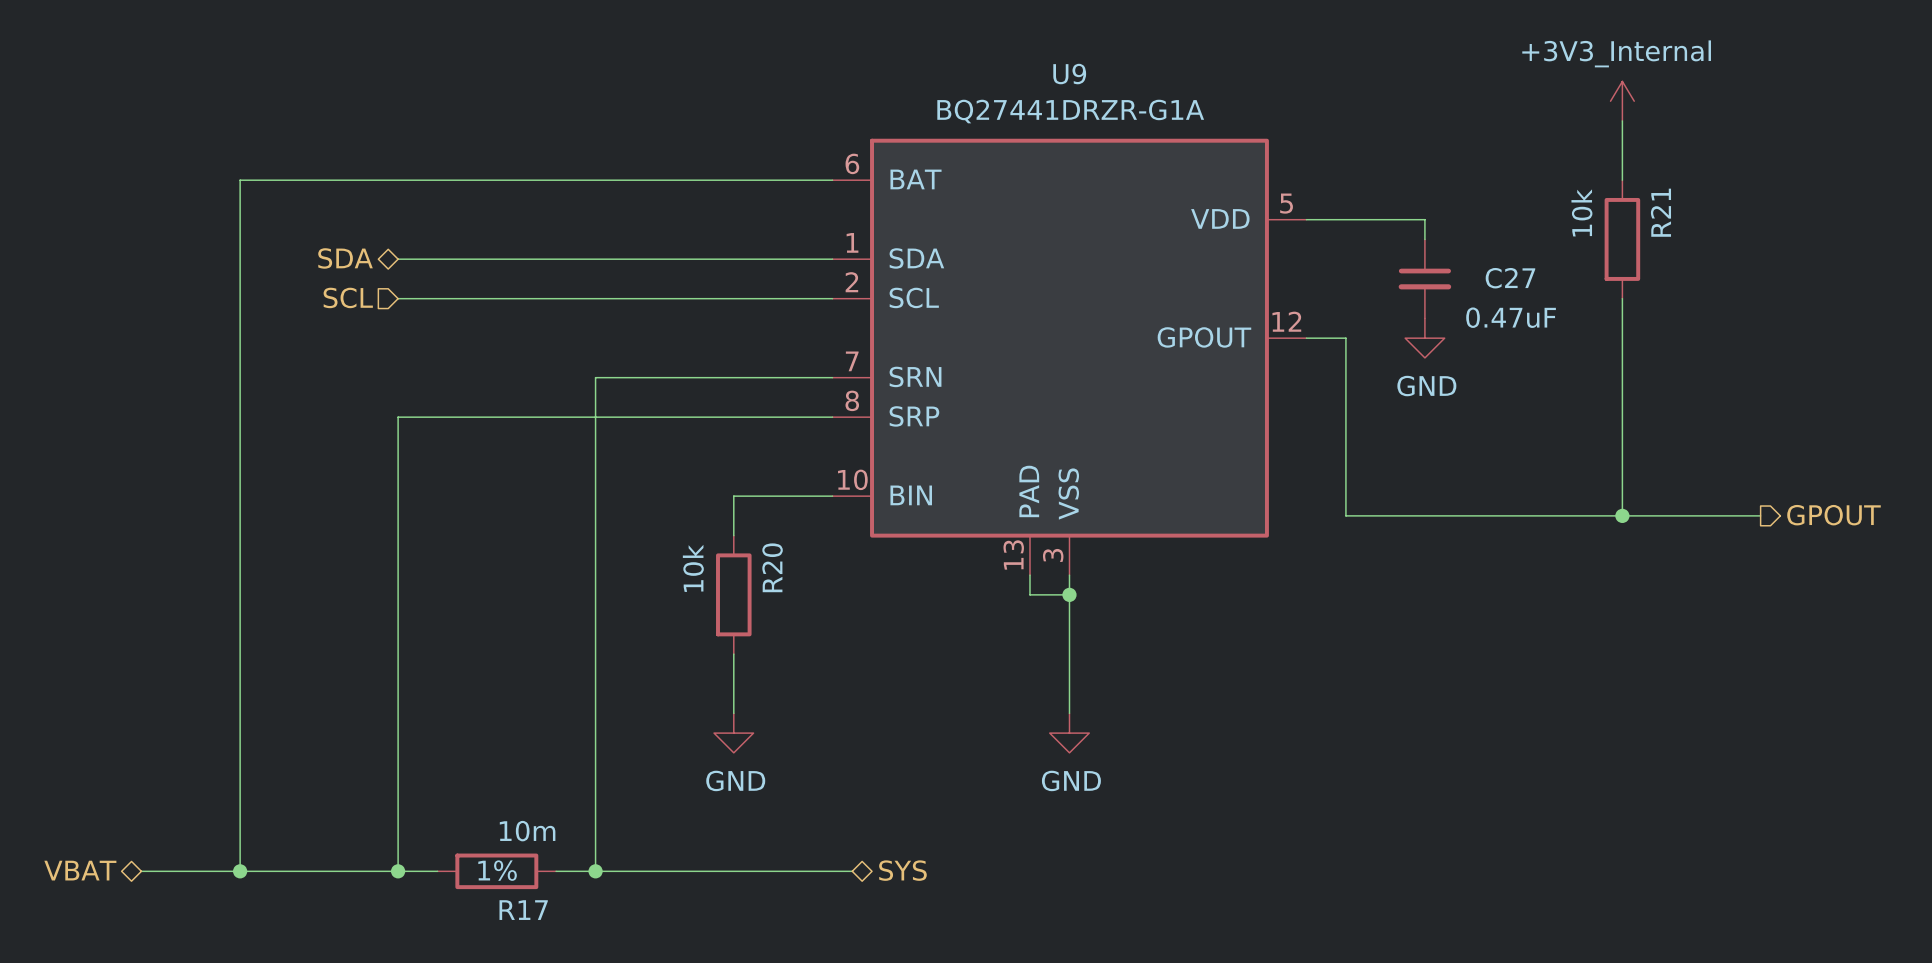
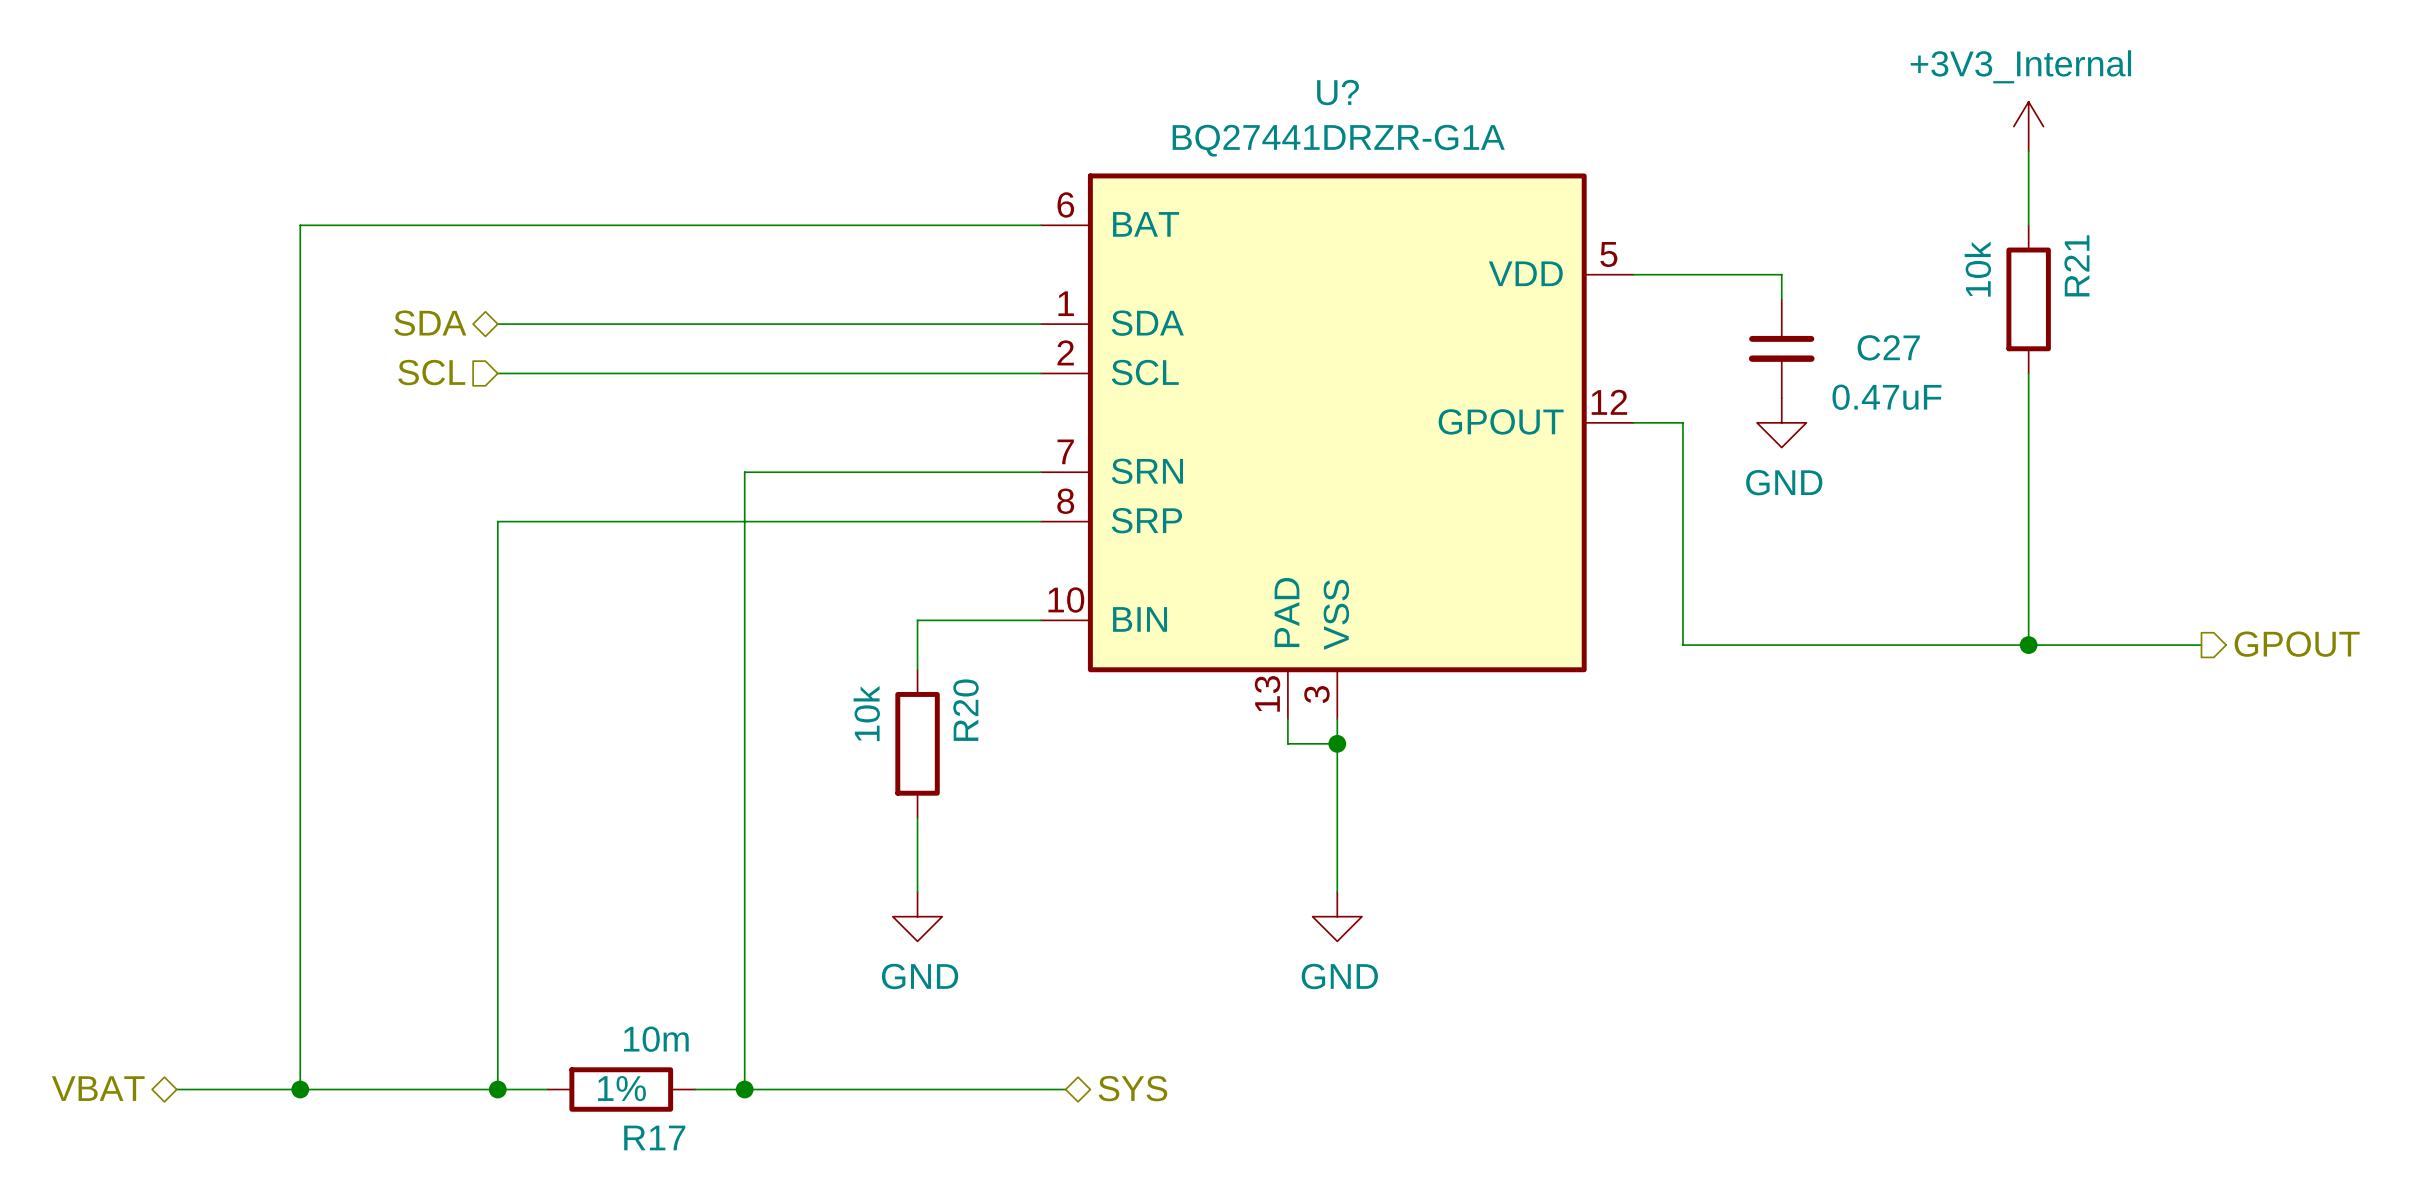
U9 name: U9 (1069, 74) -> U? (1338, 92)

